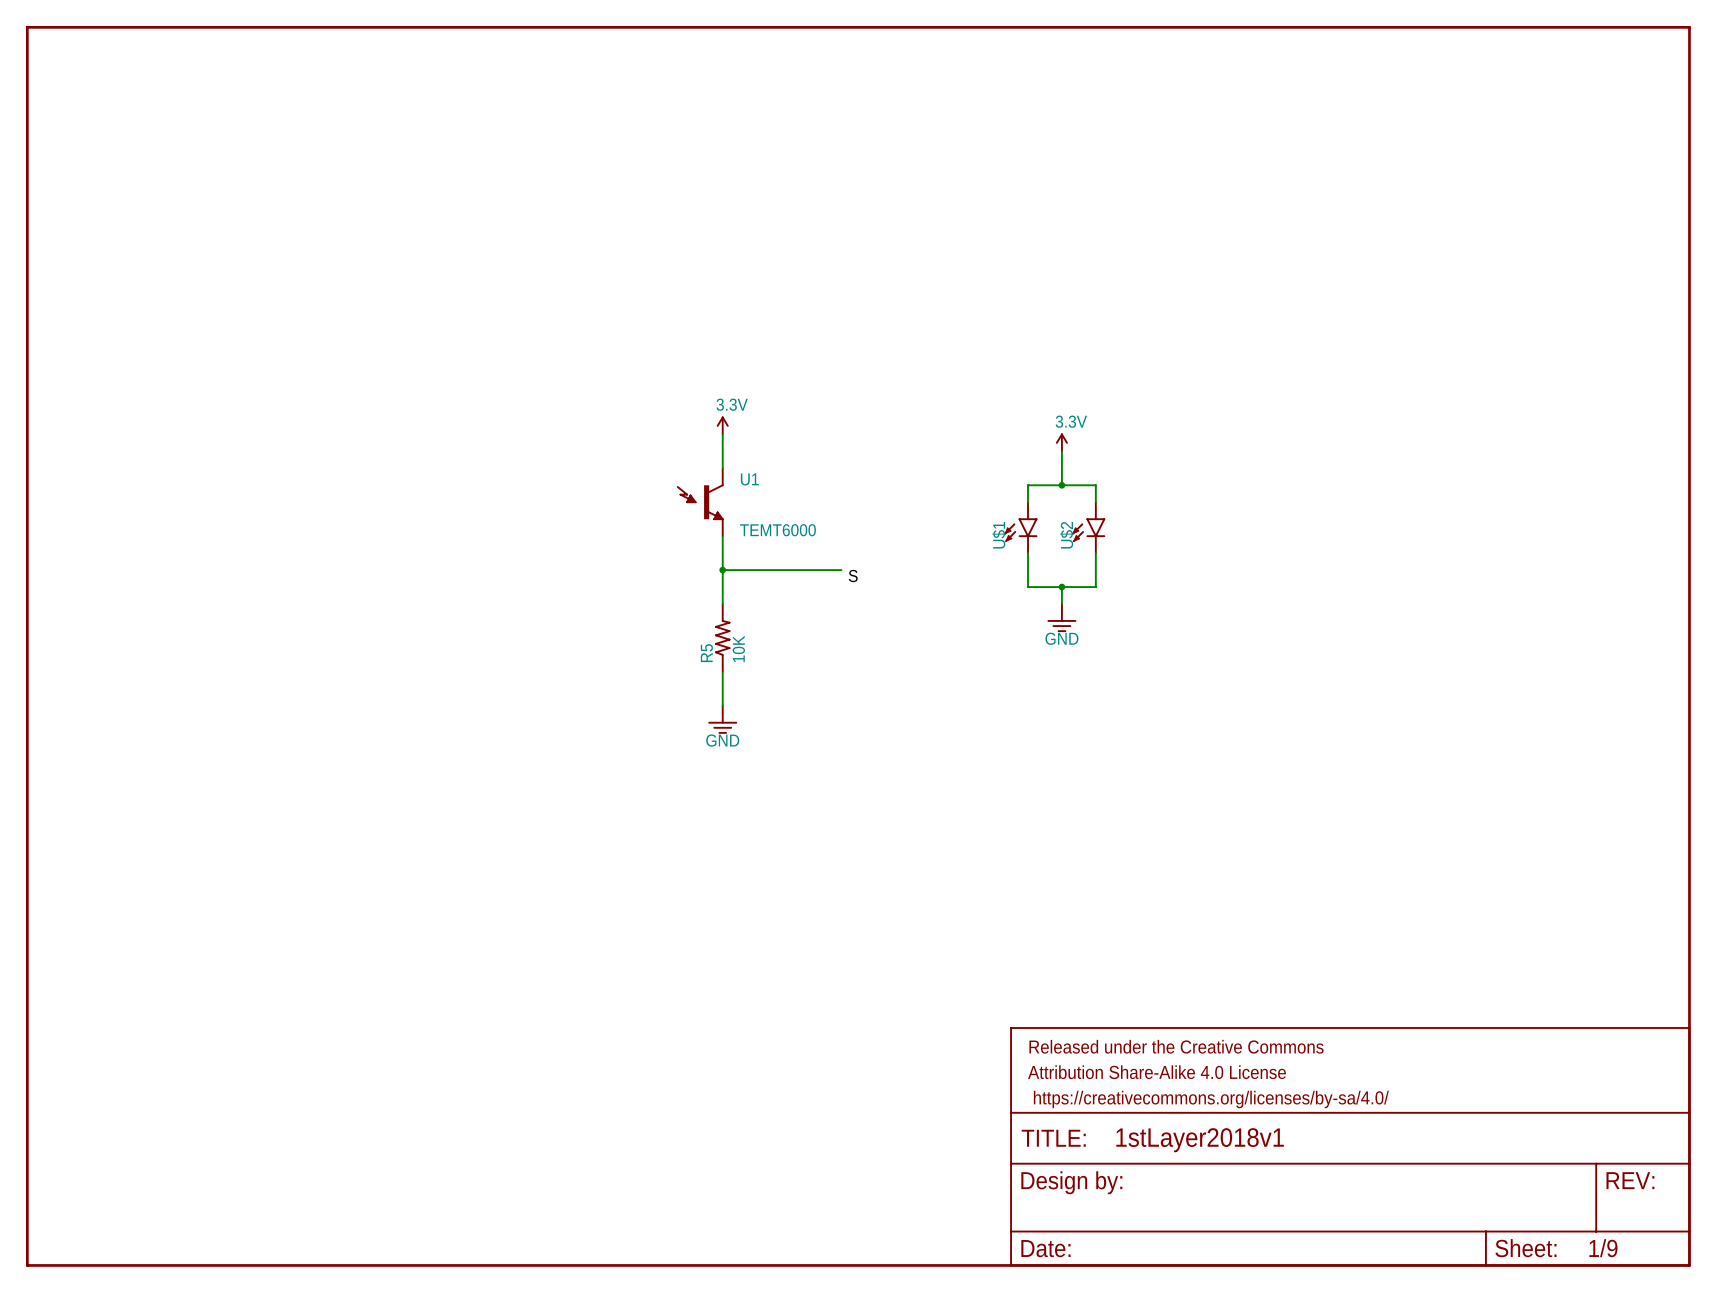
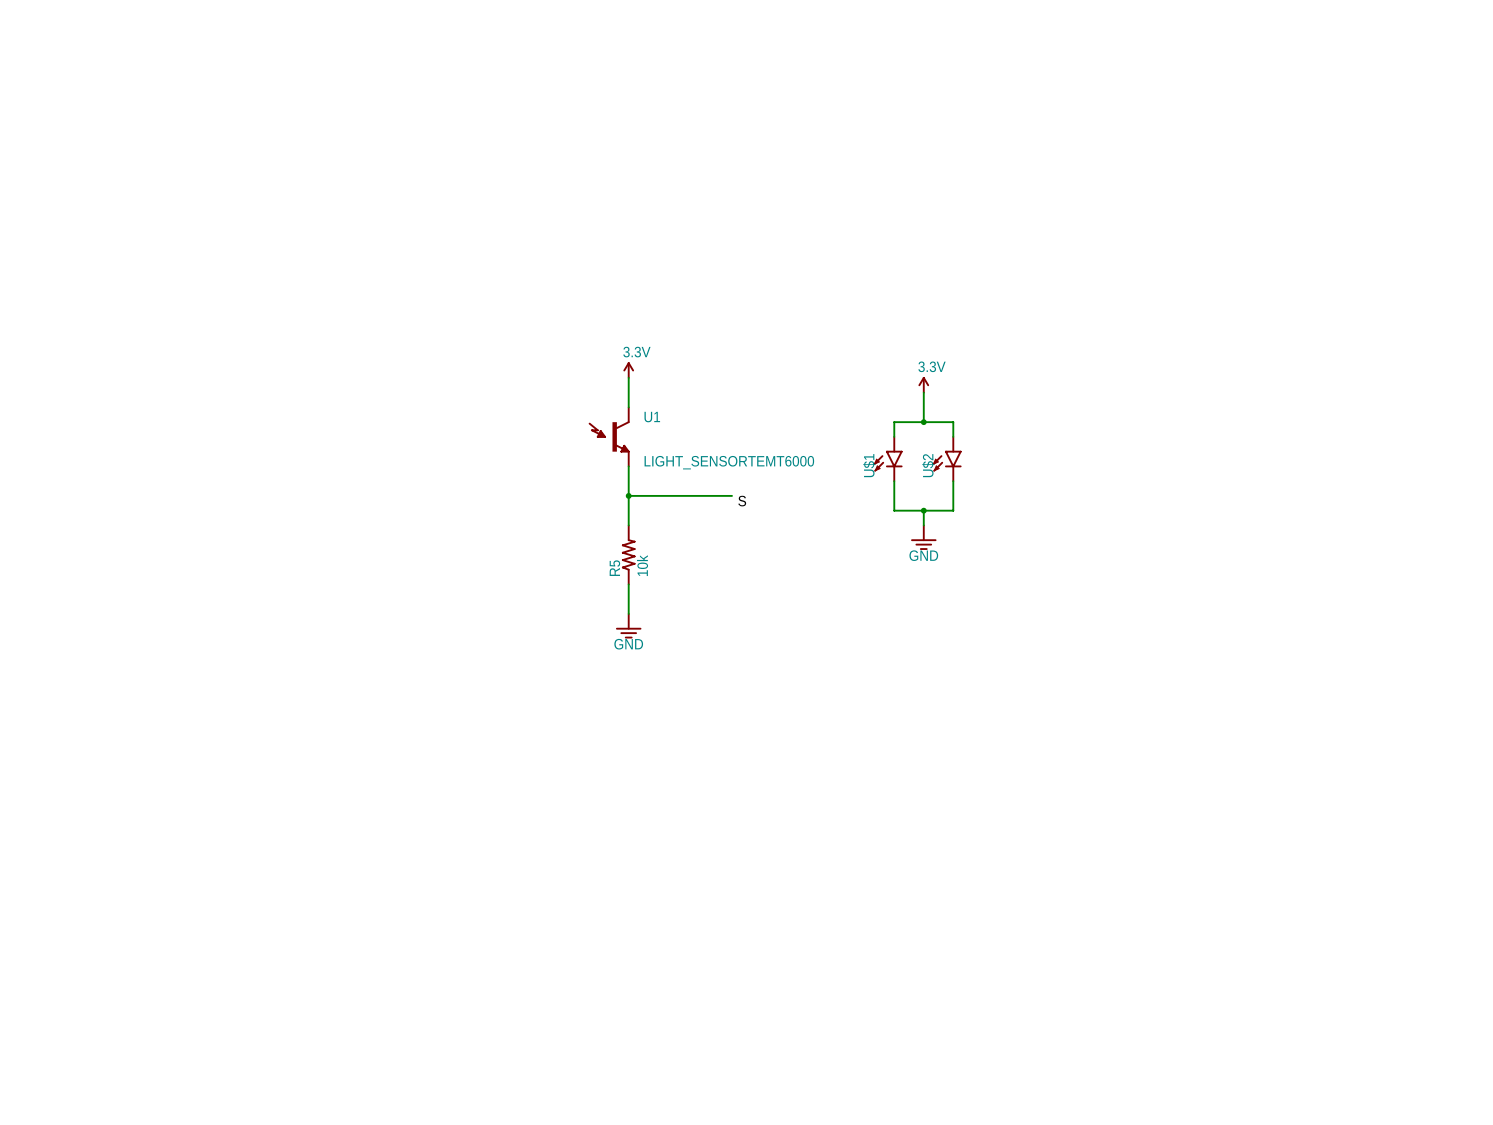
U1 value: TEMT6000 (777, 530) -> LIGHT_SENSORTEMT6000 (729, 462)
part: (858, 646) -> none
R5 value: 10K (738, 649) -> 10k (642, 565)
part: (1350, 1146) -> none

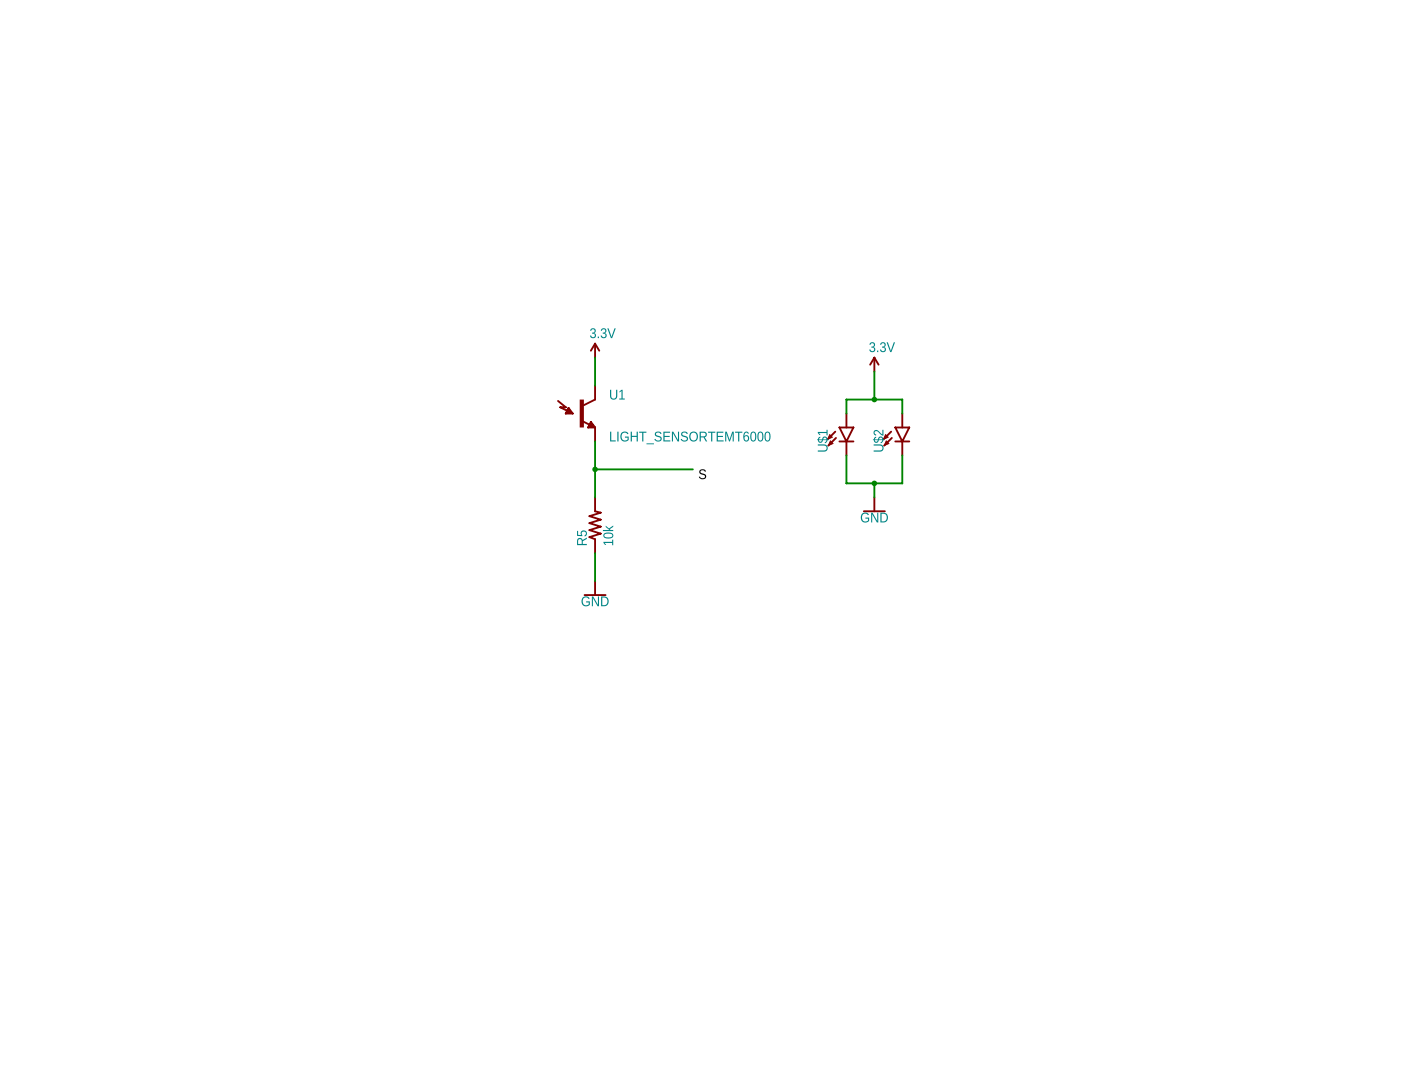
power symbol shape: [911, 525, 937, 550] -> [863, 497, 886, 512]
power symbol shape: [616, 613, 642, 639] -> [583, 581, 607, 596]

